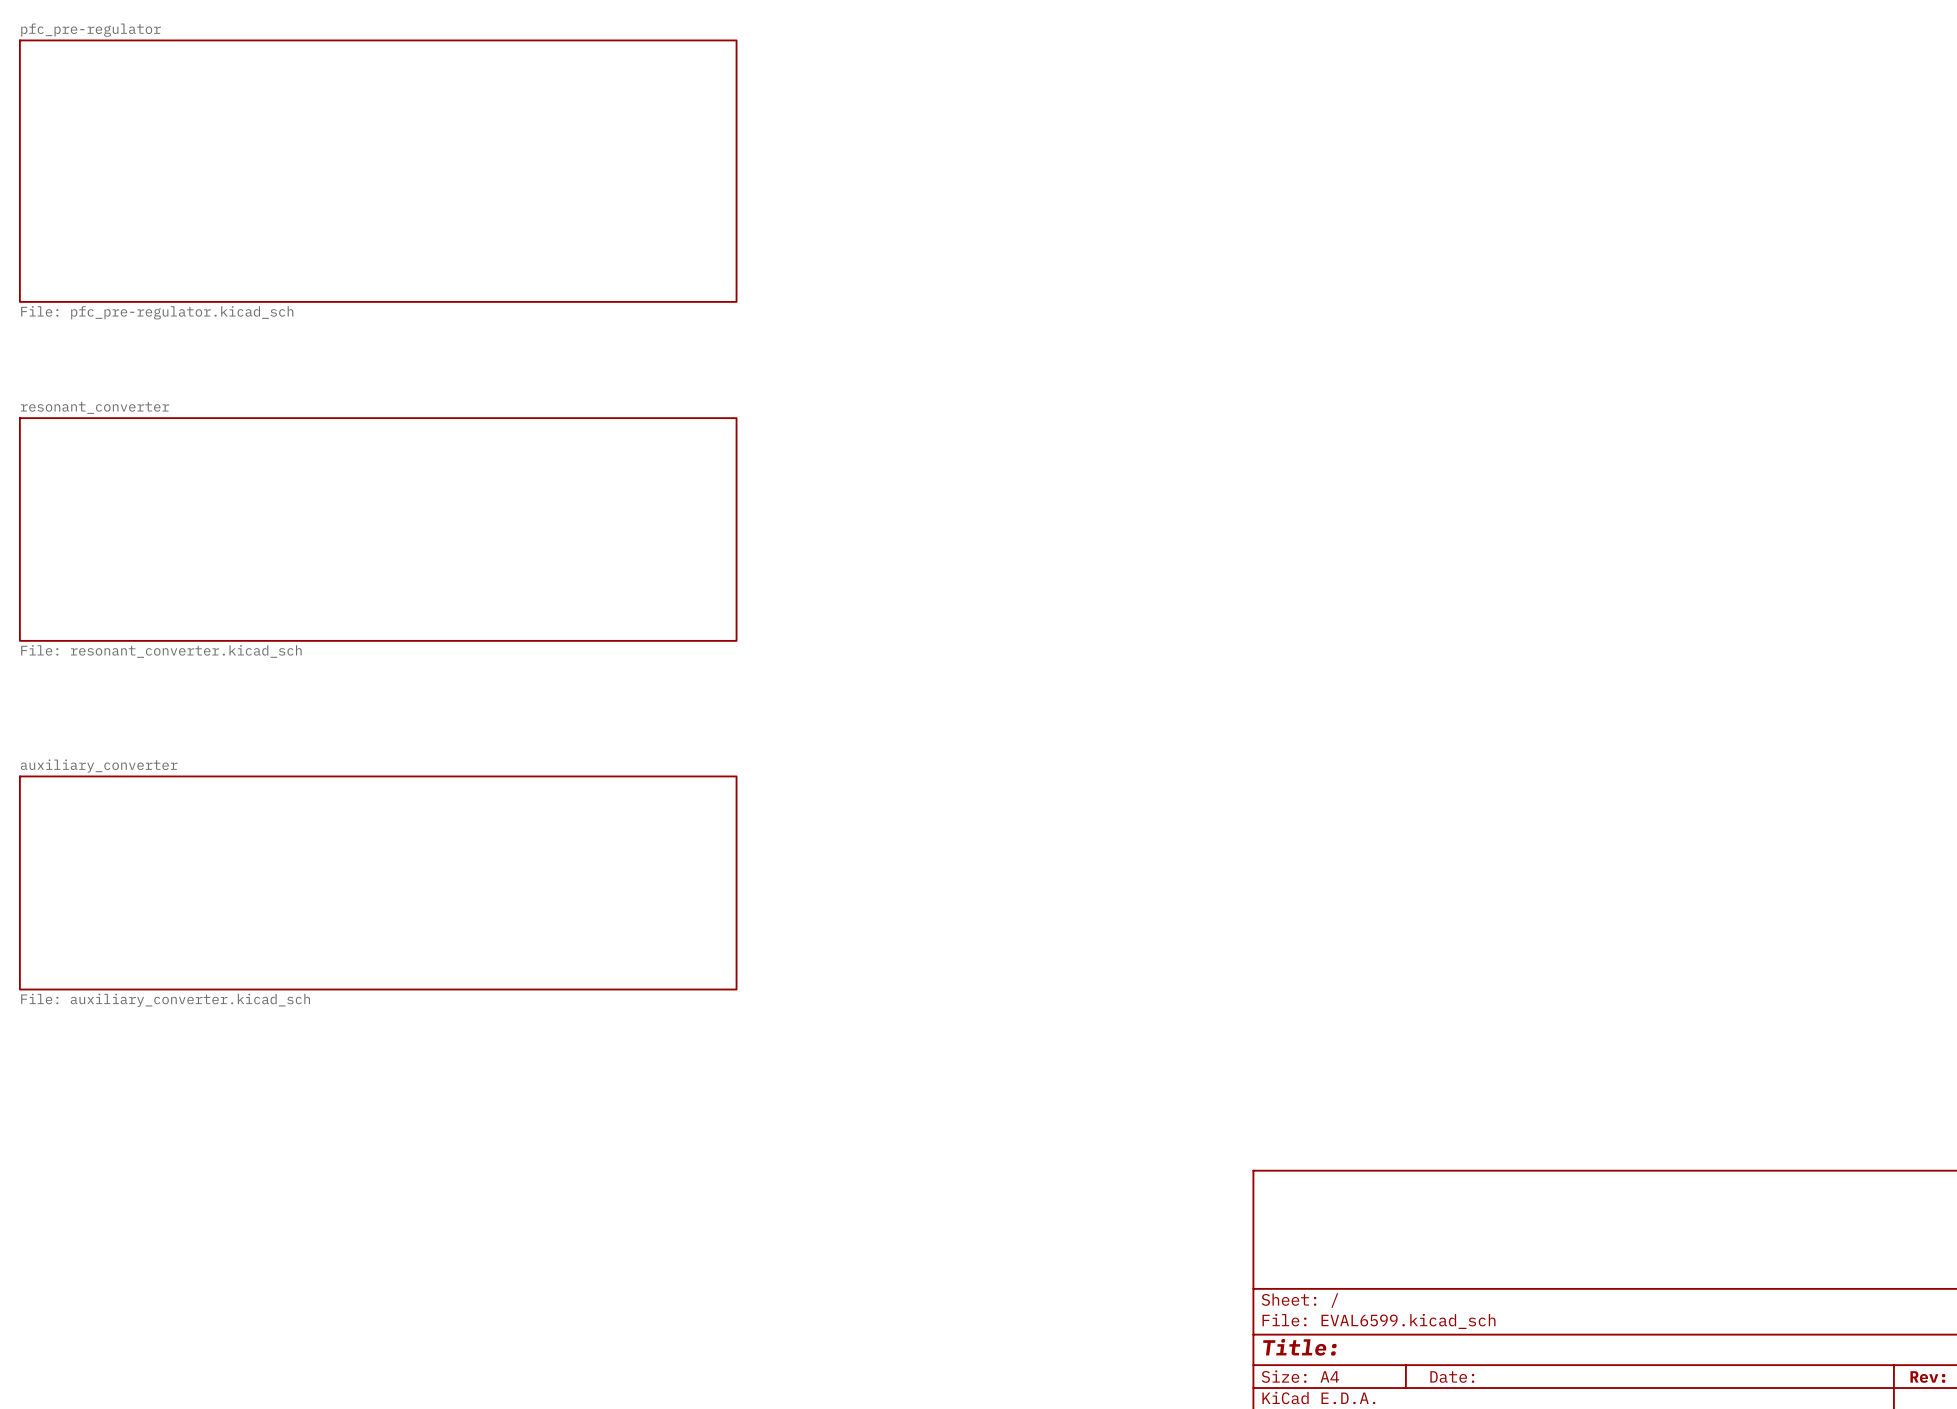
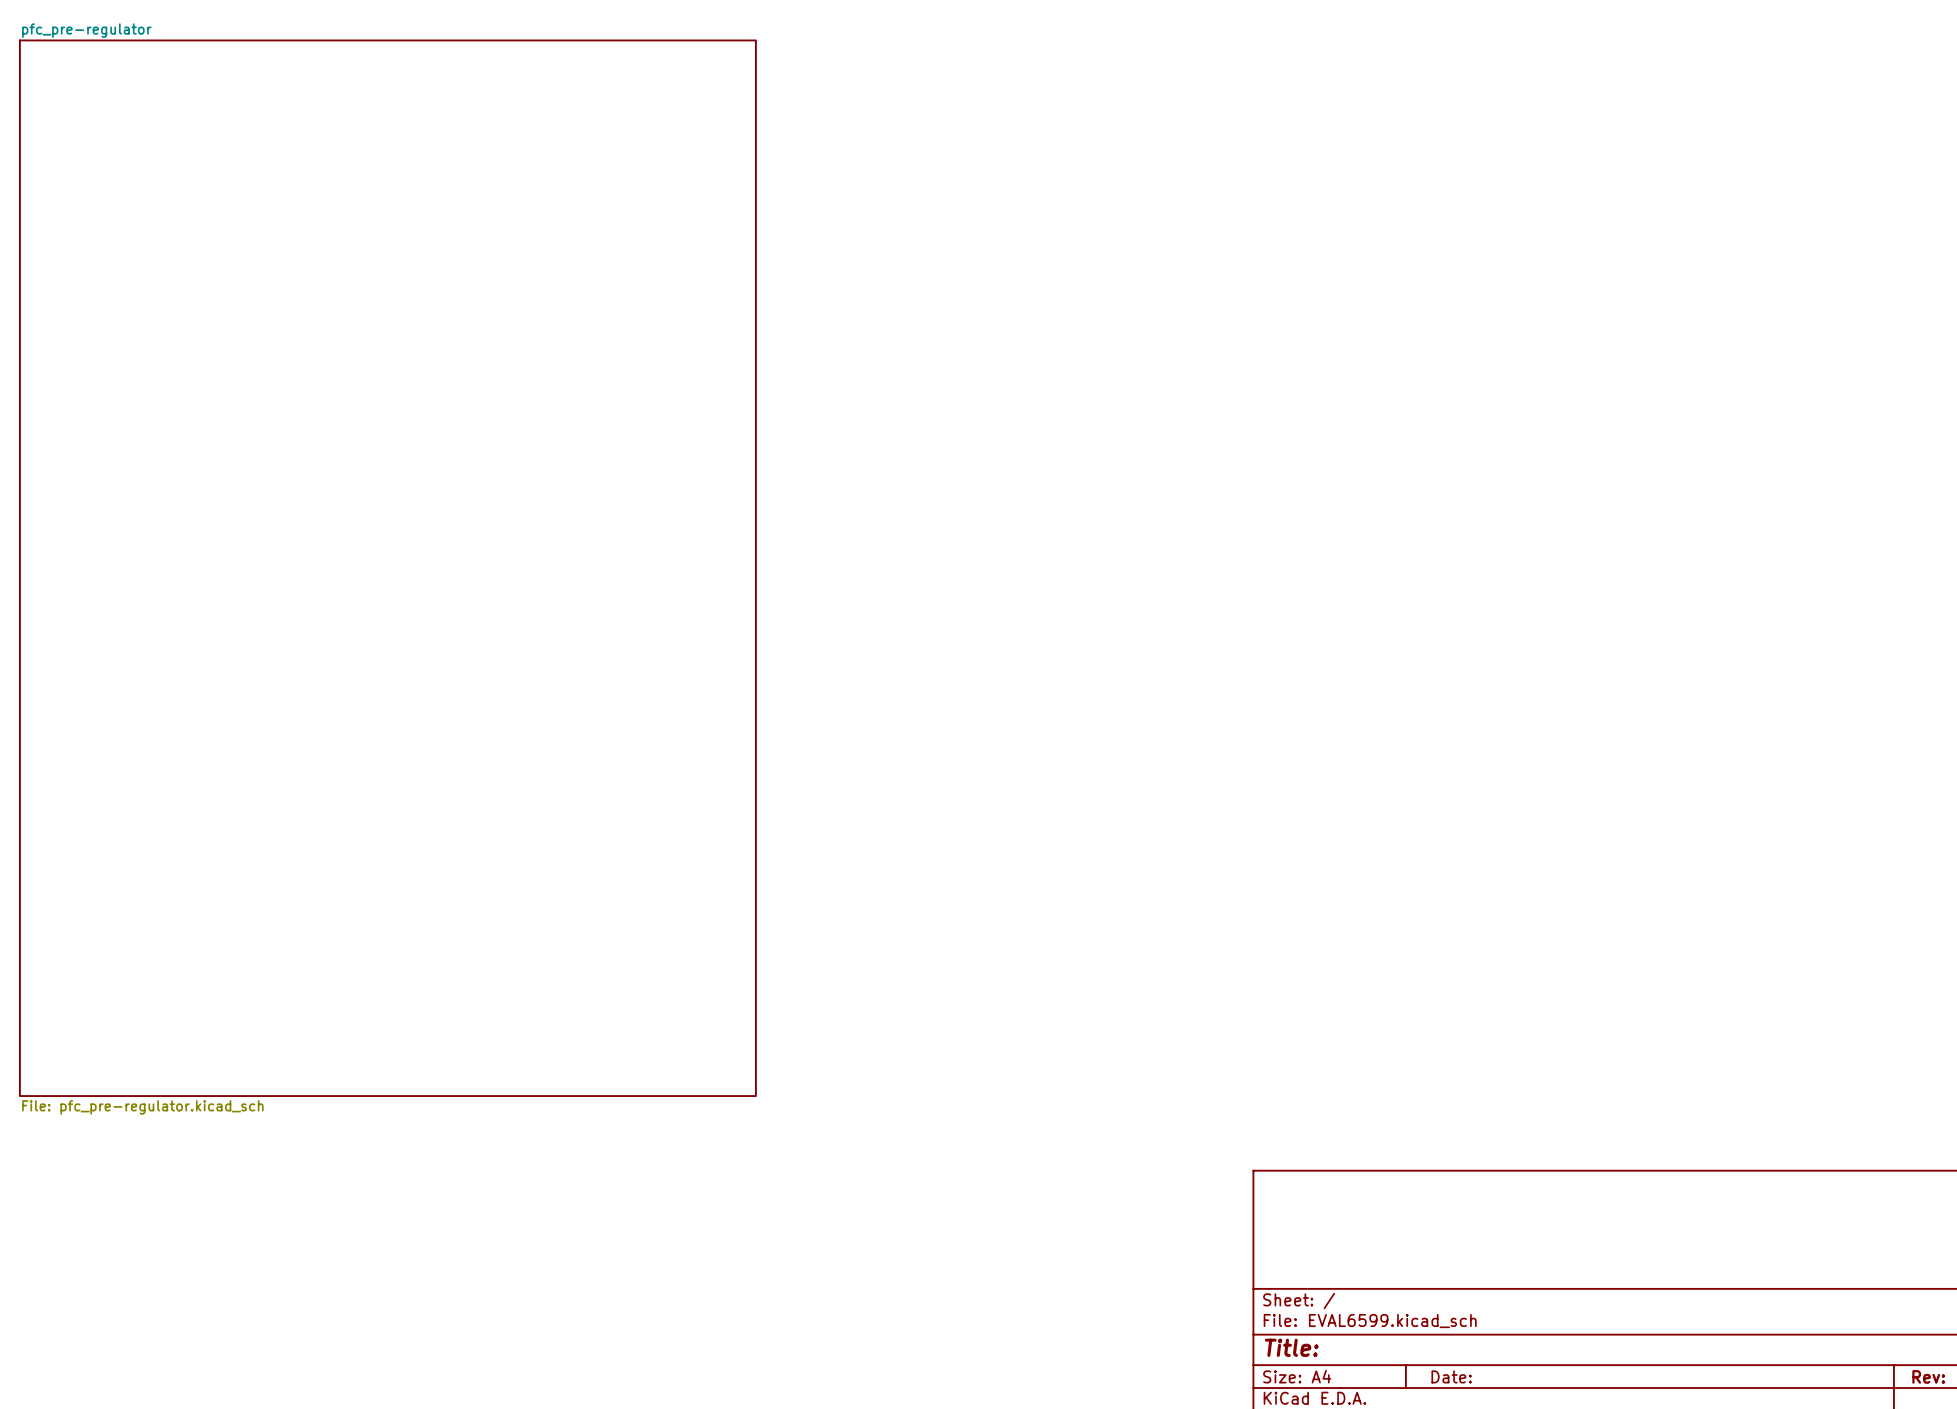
sheet pfc_pre-regulator: File: pfc_pre-regulator.kicad_sch (378, 171) -> none
sheet resonant_converter: File: resonant_converter.kicad_sch (378, 529) -> none
sheet pfc_pre-regulator: none -> File: pfc_pre-regulator.kicad_sch (387, 568)
sheet auxiliary_converter: File: auxiliary_converter.kicad_sch (378, 882) -> none

